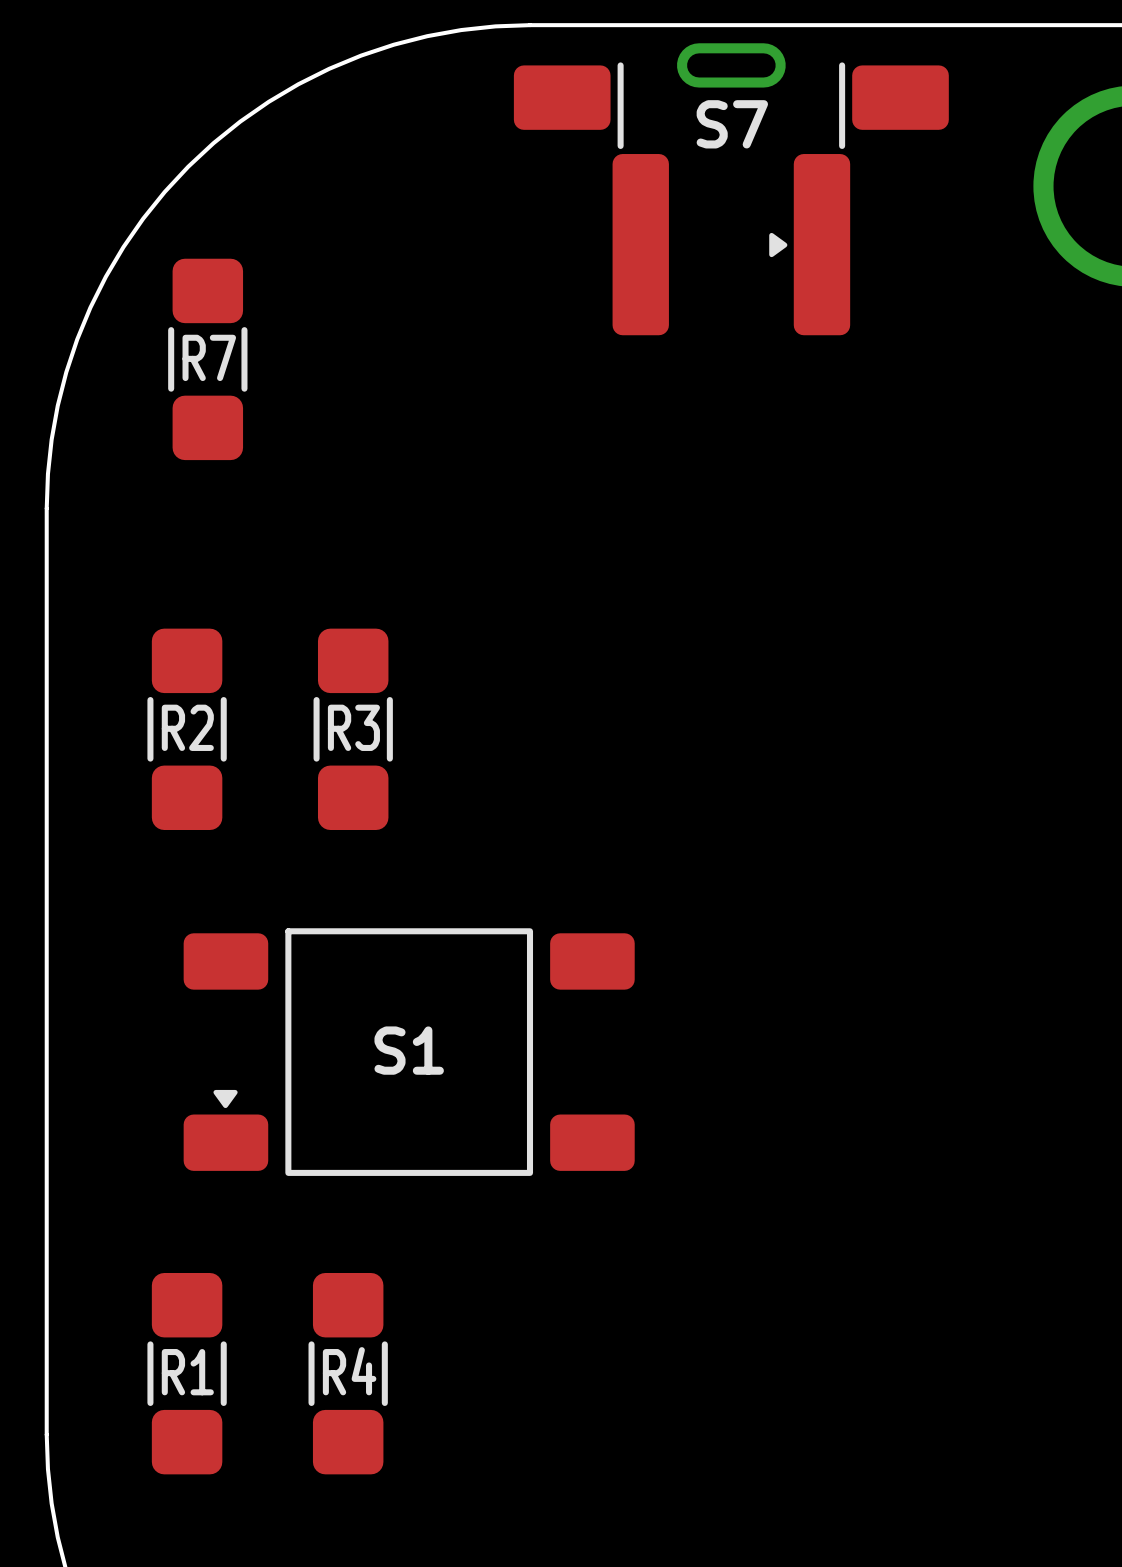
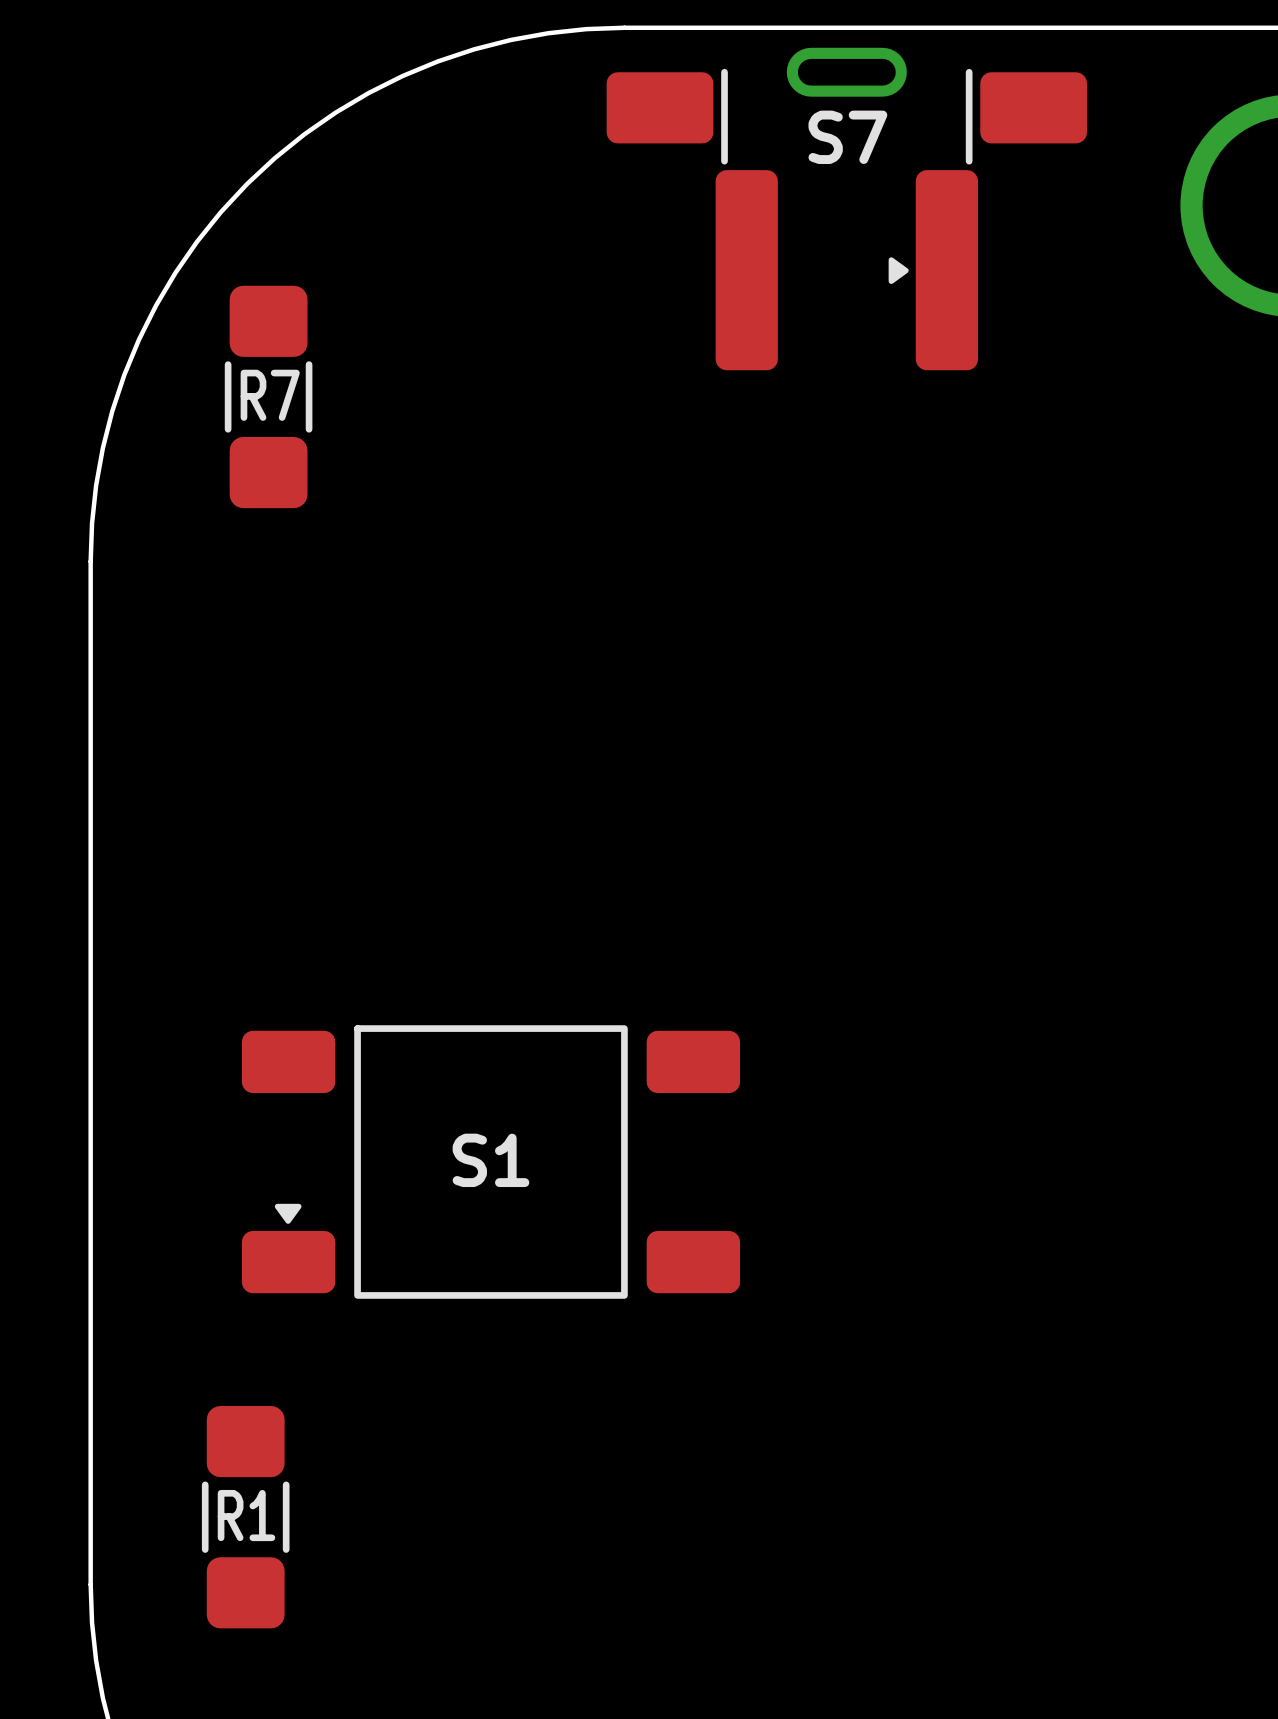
R2: (187, 729) -> none
R3: (353, 729) -> none
R4: (348, 1373) -> none

